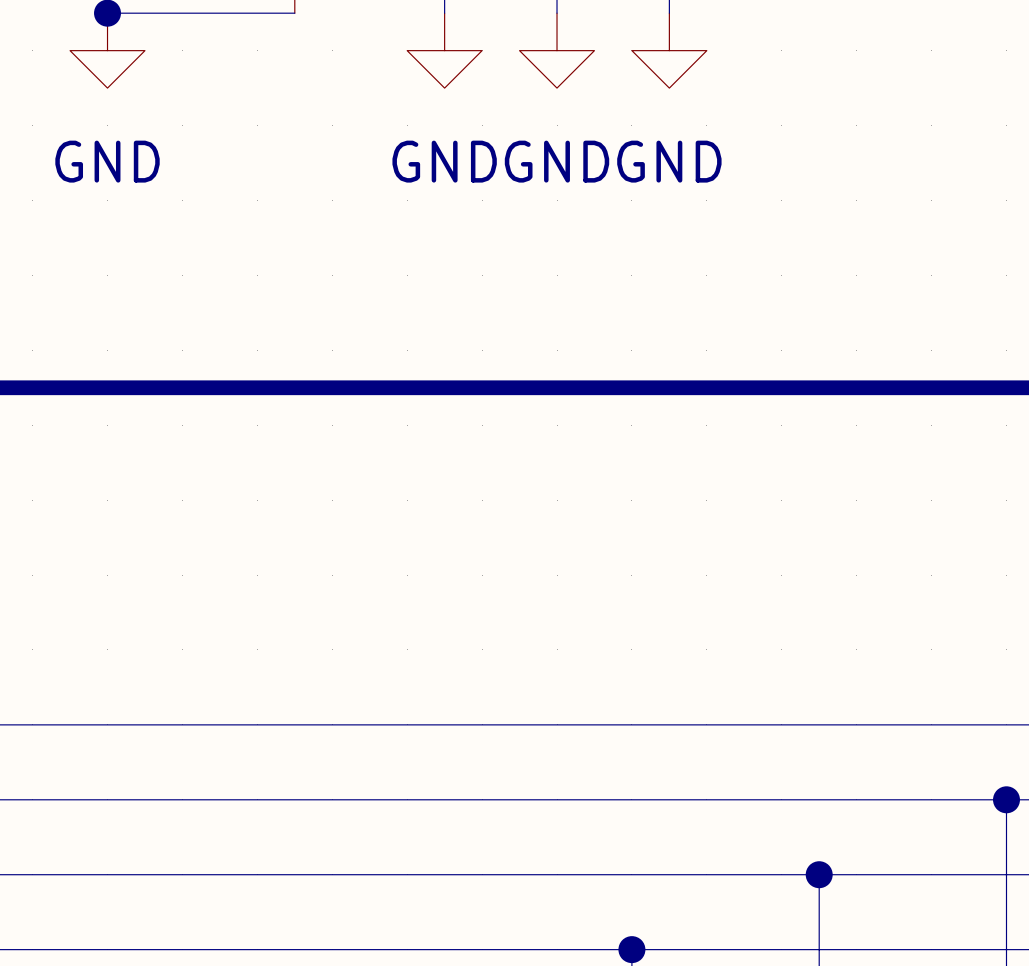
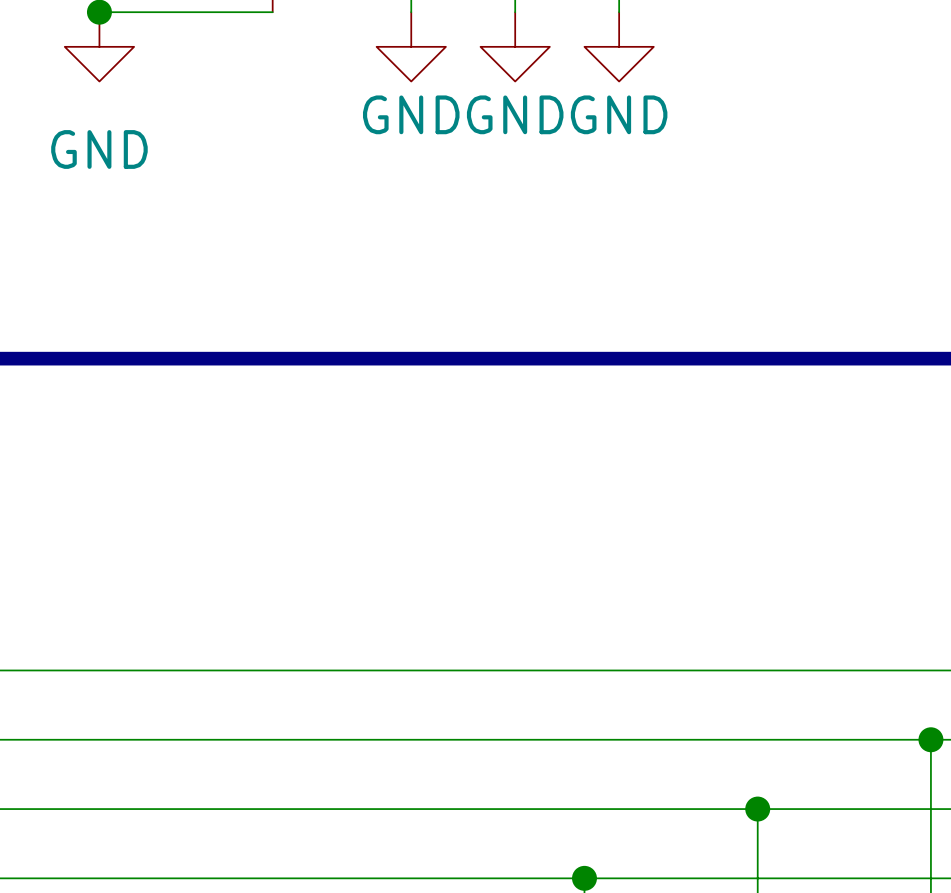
power symbol text position: GND (444, 161) -> GND (411, 114)
power symbol text position: GND (557, 161) -> GND (515, 114)
power symbol text position: GND (669, 161) -> GND (619, 114)

